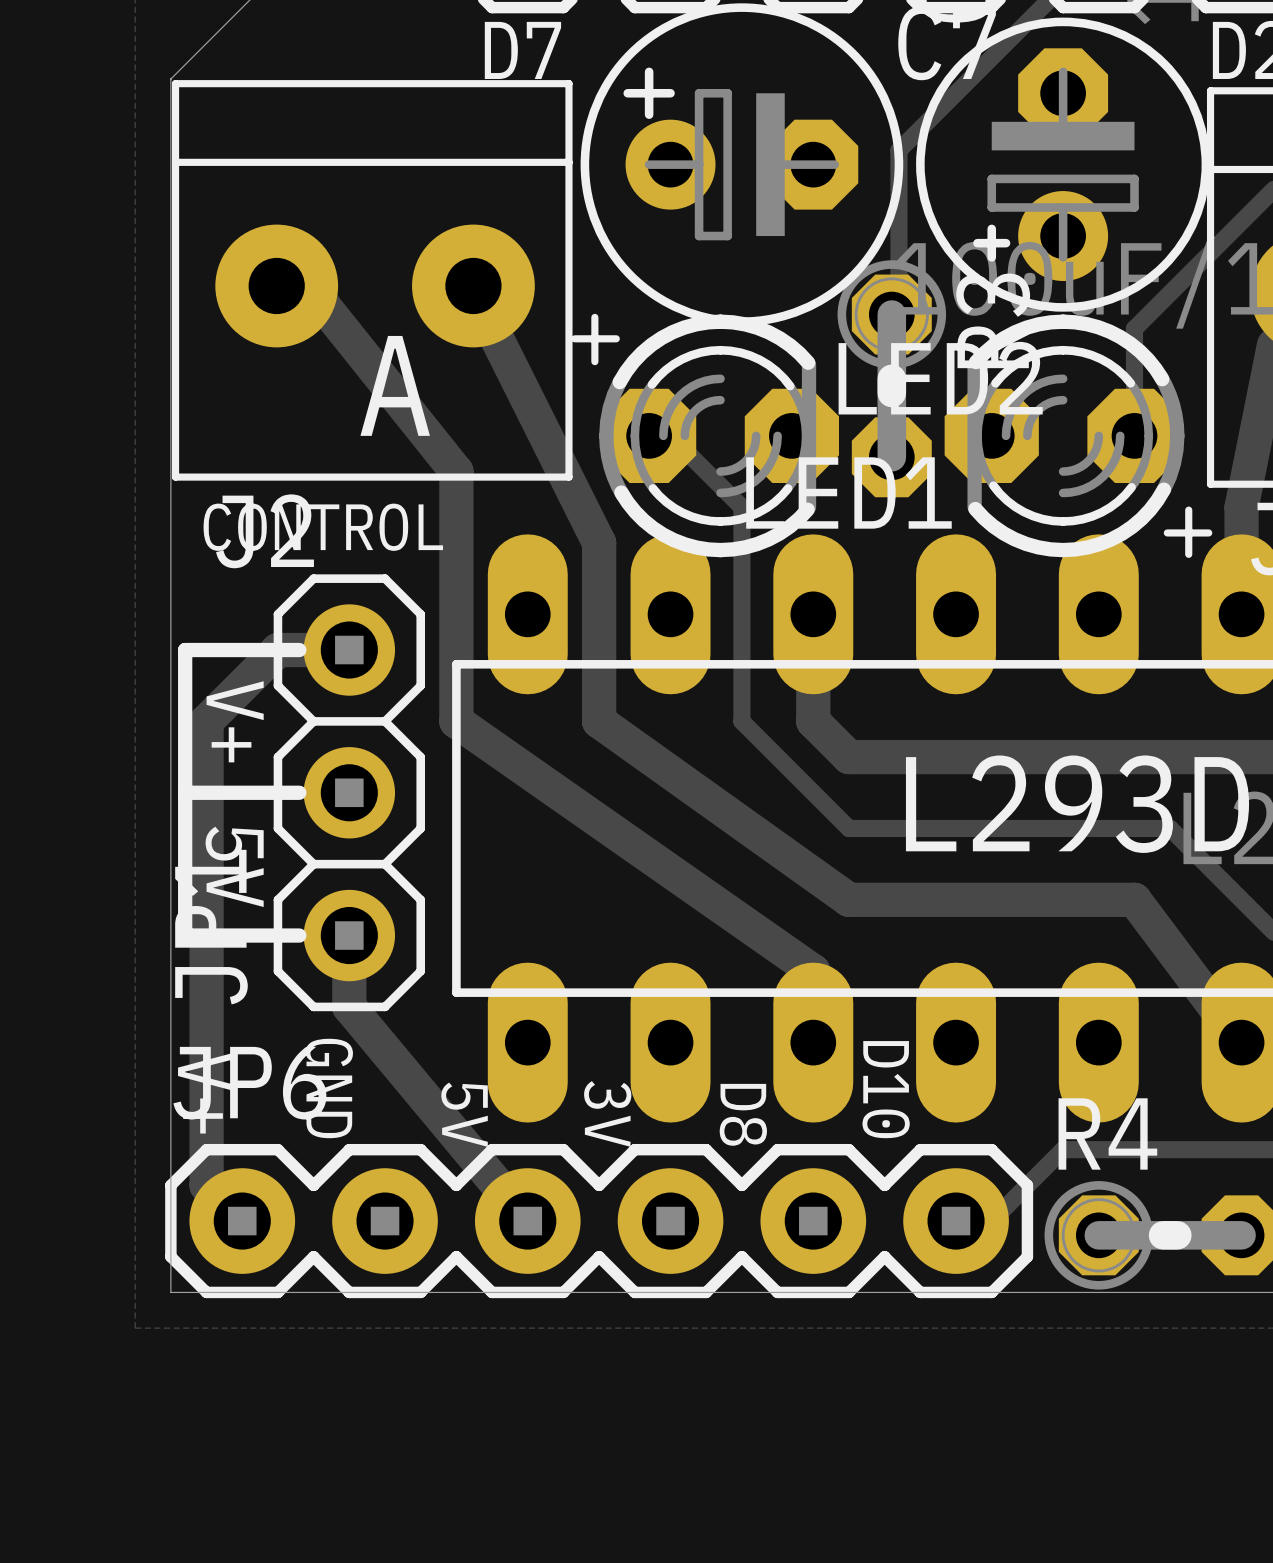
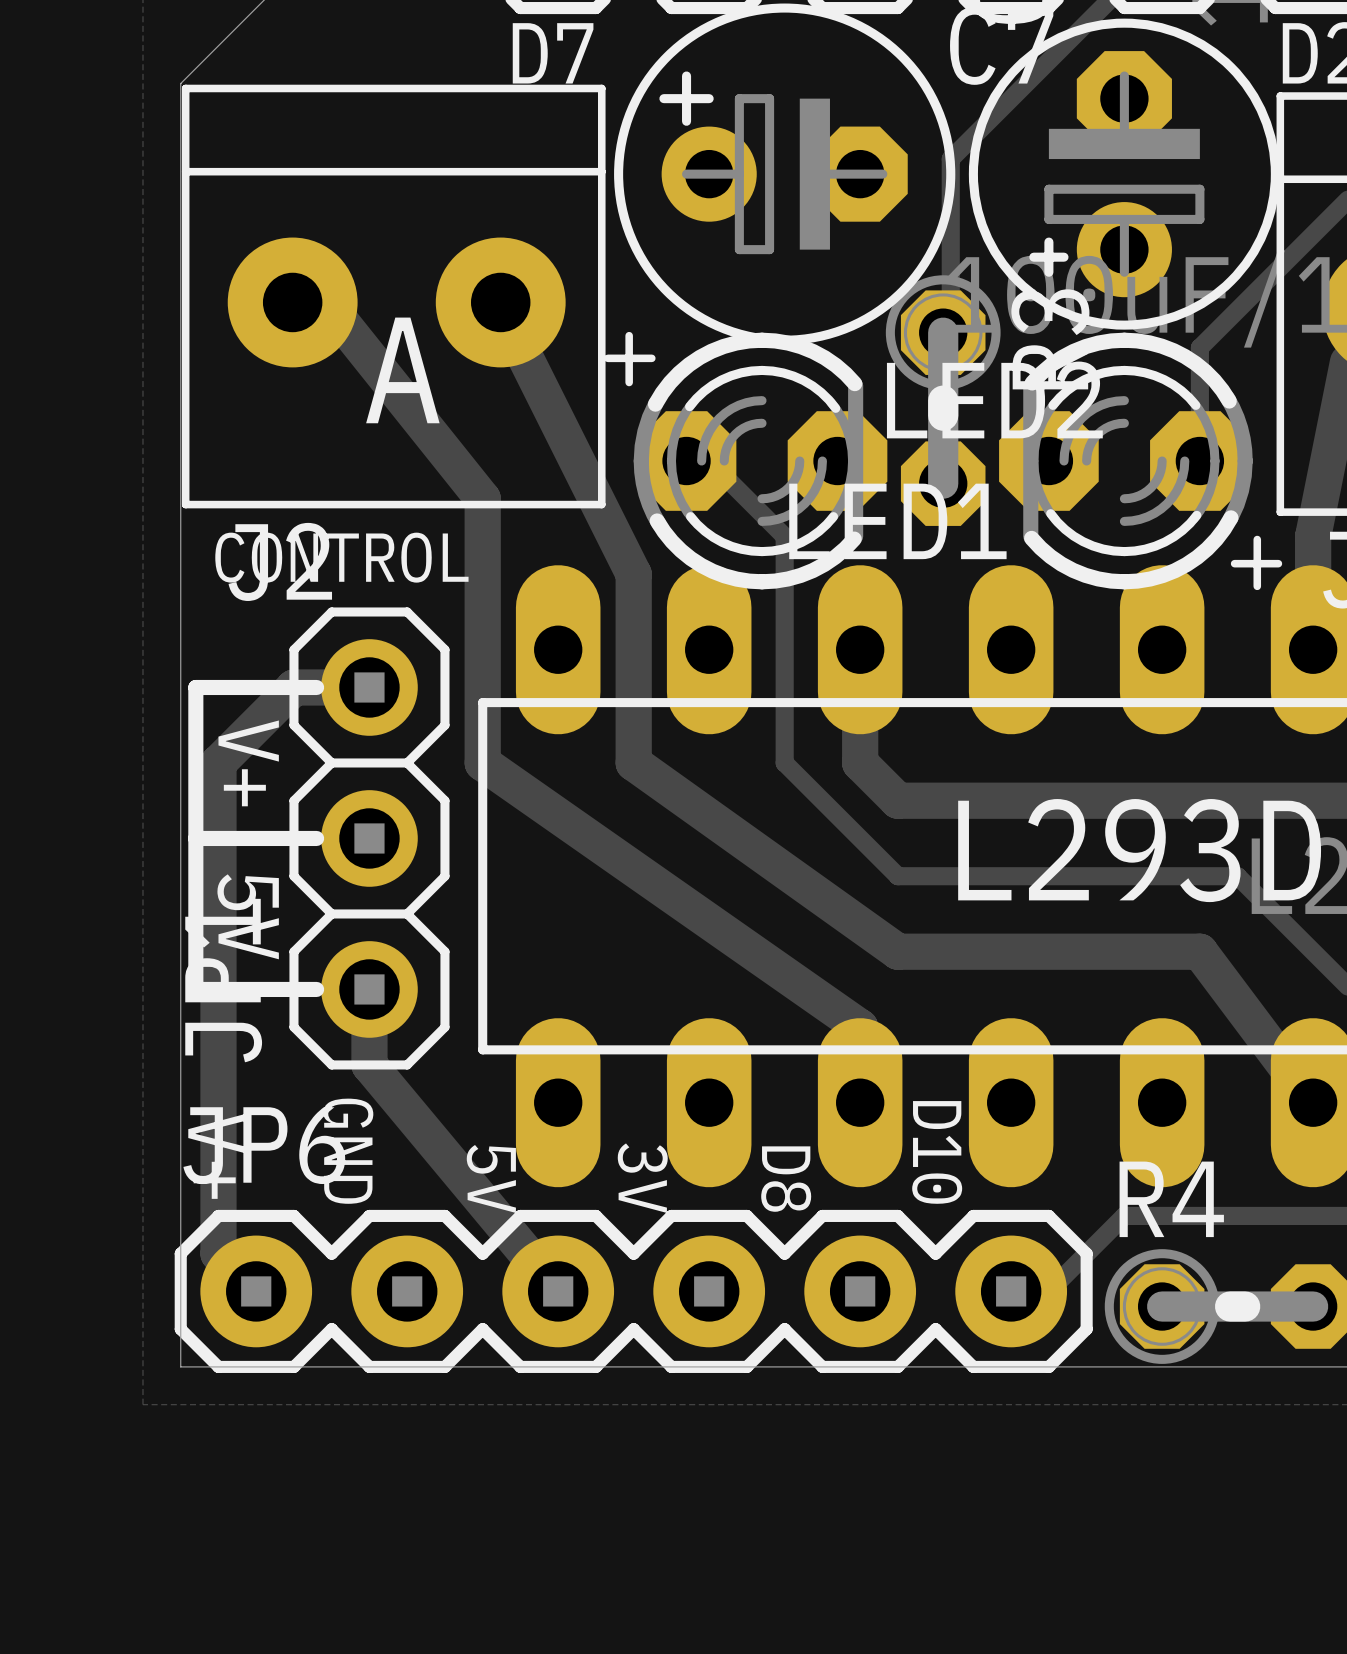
text position: A (395, 385) -> A (402, 370)

